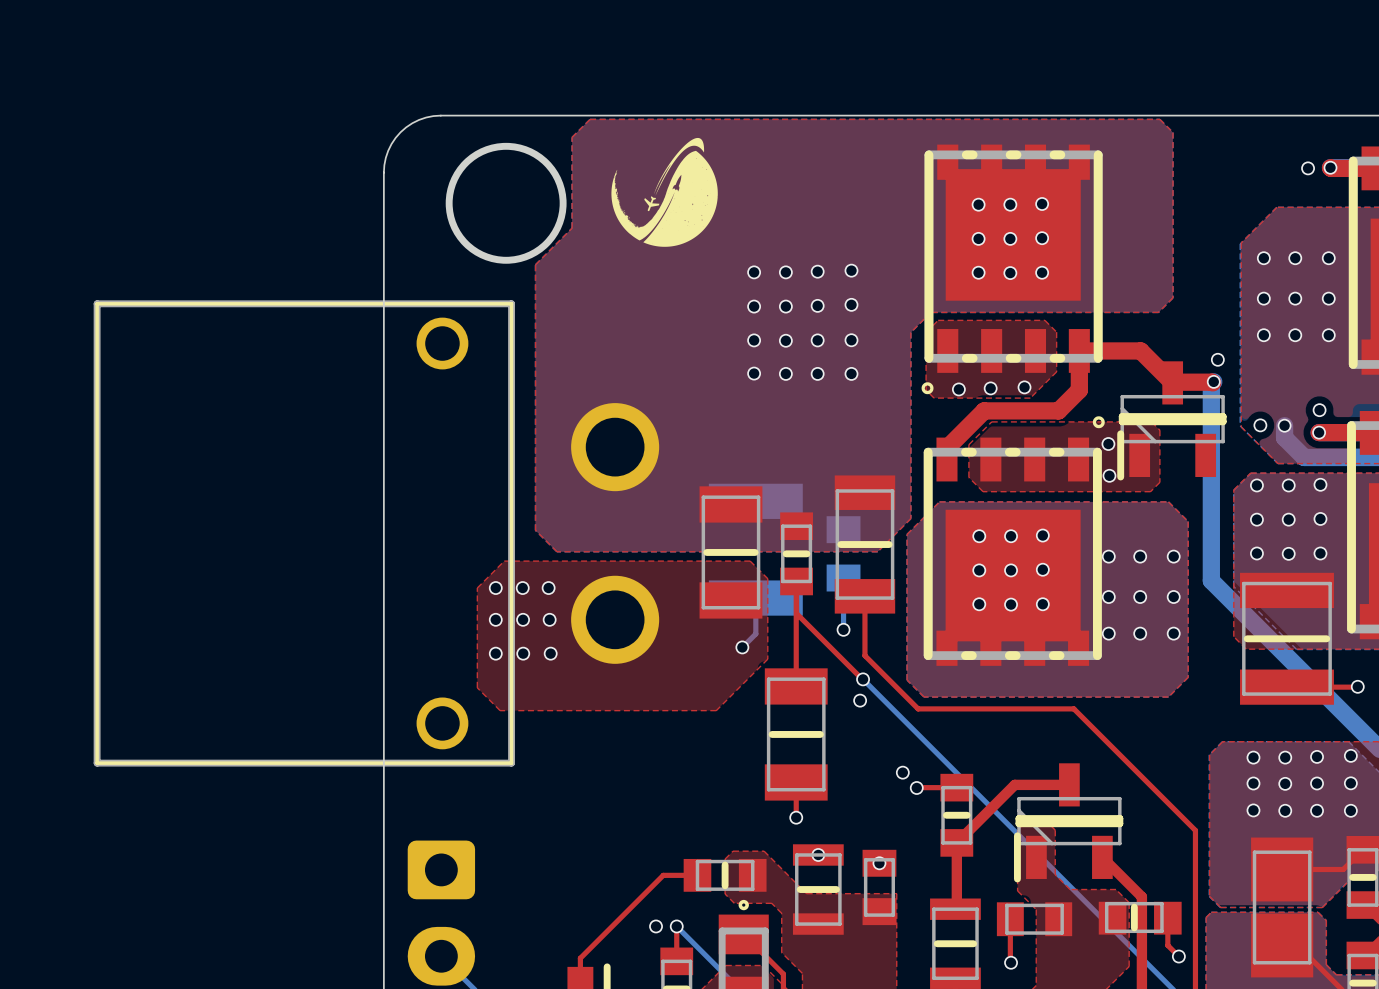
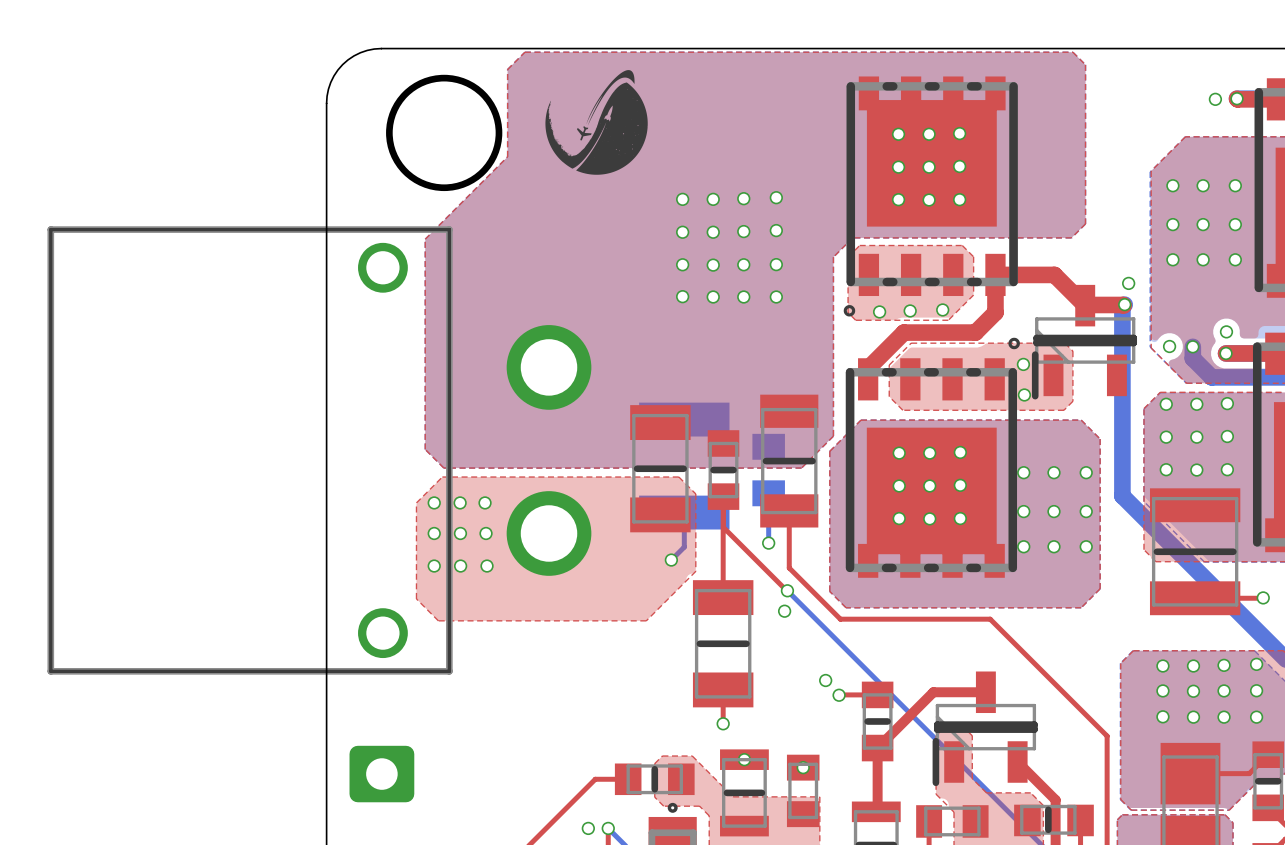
top zone outline: (535, 264) (535, 530) (556, 551) -> (472, 192) (425, 239) (425, 449) (443, 468) (493, 468)

